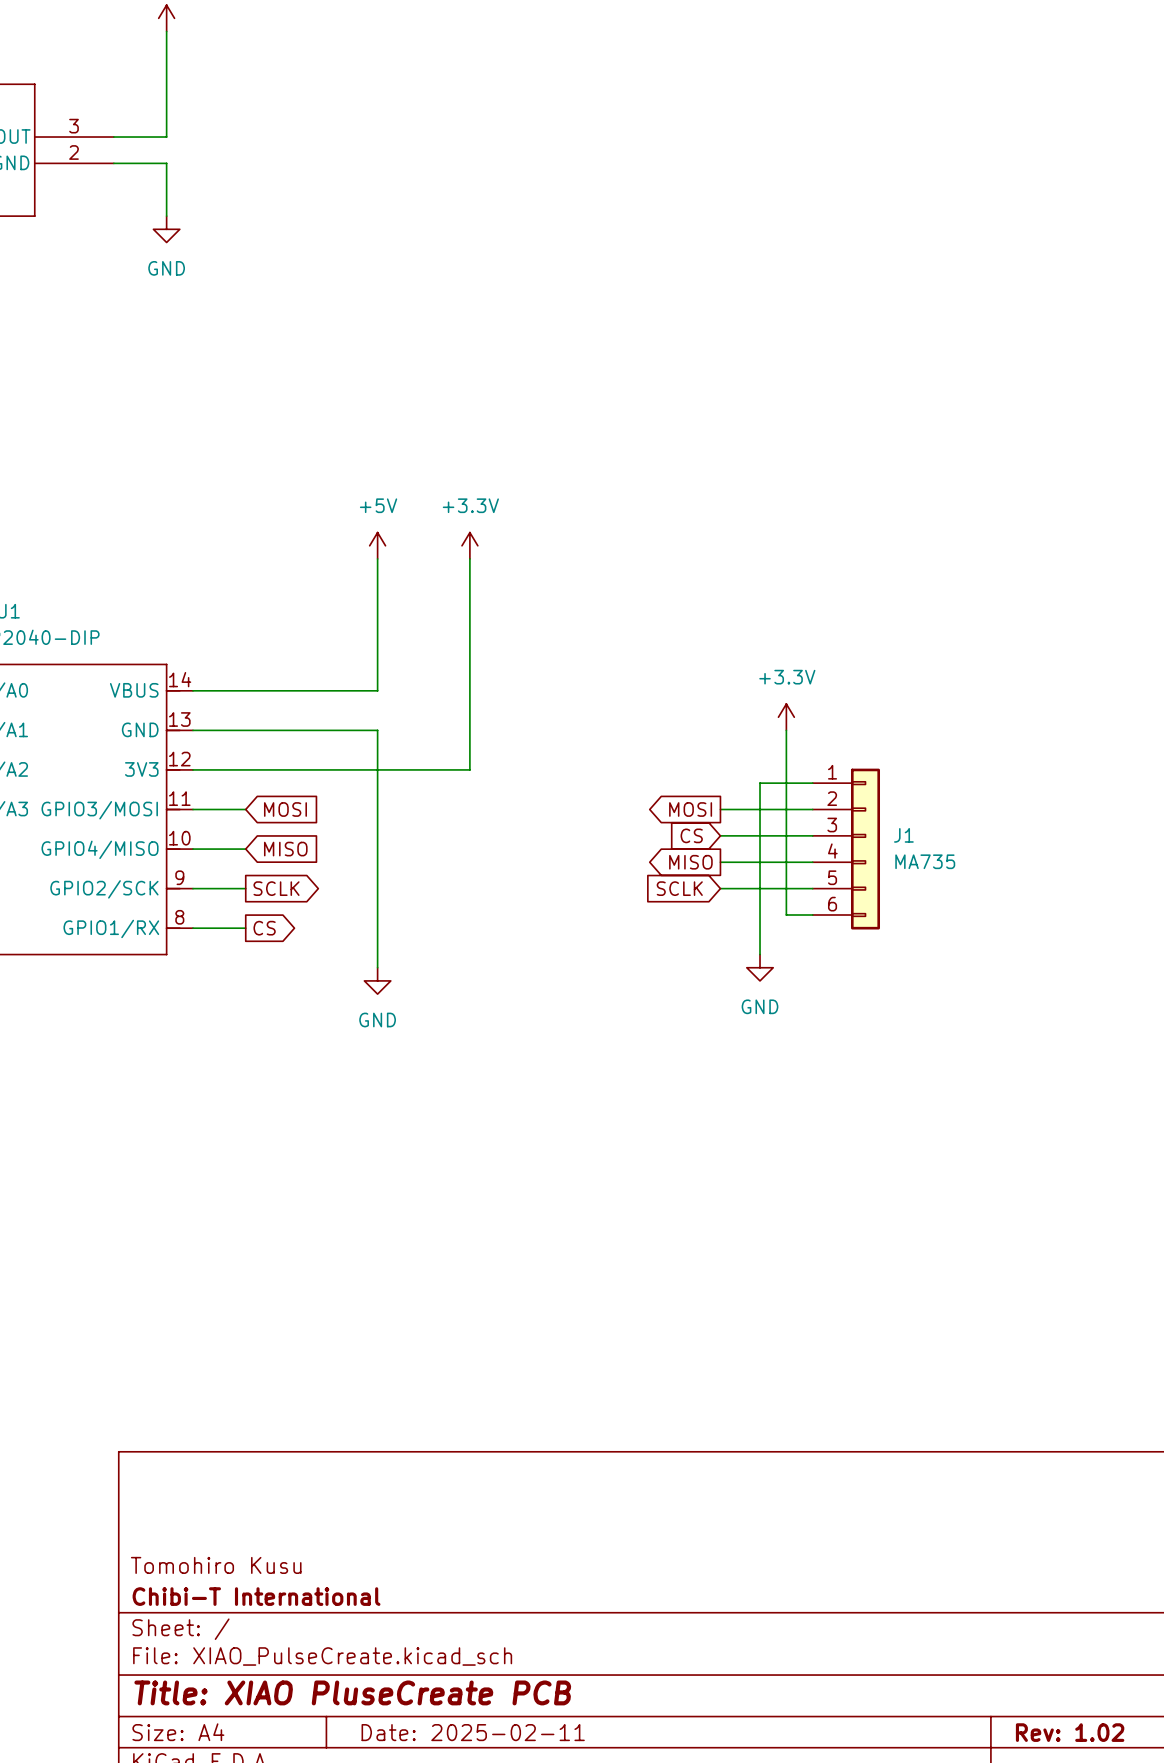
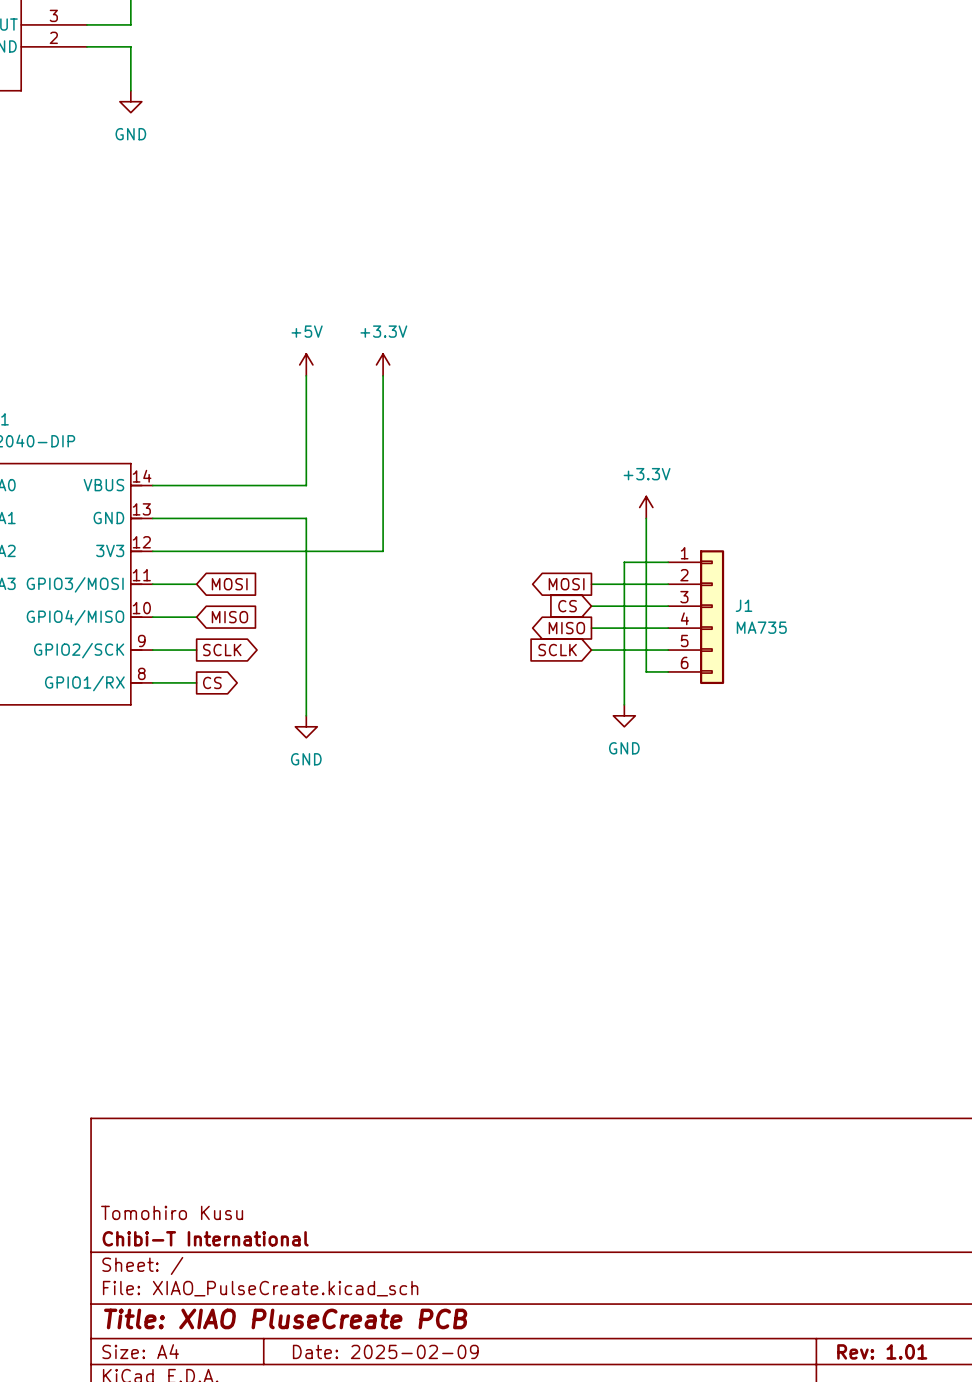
title block: Date: 2025-02-11 (473, 1732) -> Date: 2025-02-09 (385, 1351)
title block: Rev: 1.02 (1070, 1732) -> Rev: 1.01 (882, 1351)

